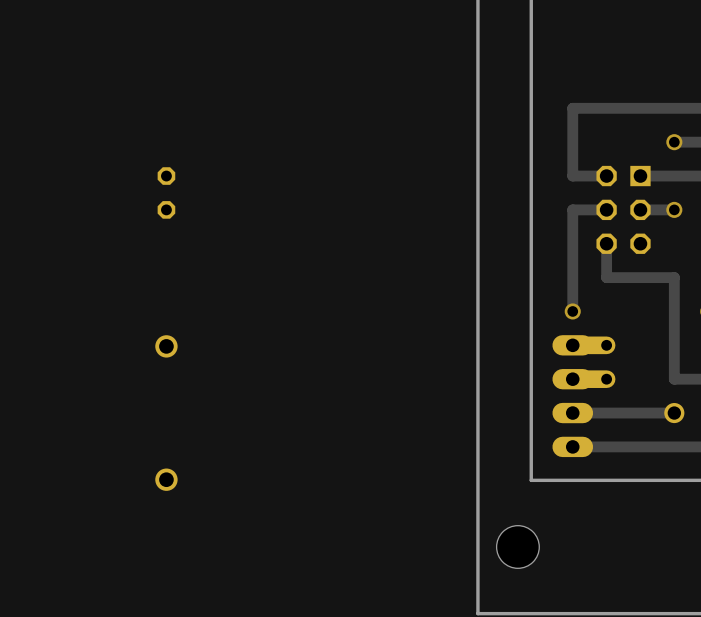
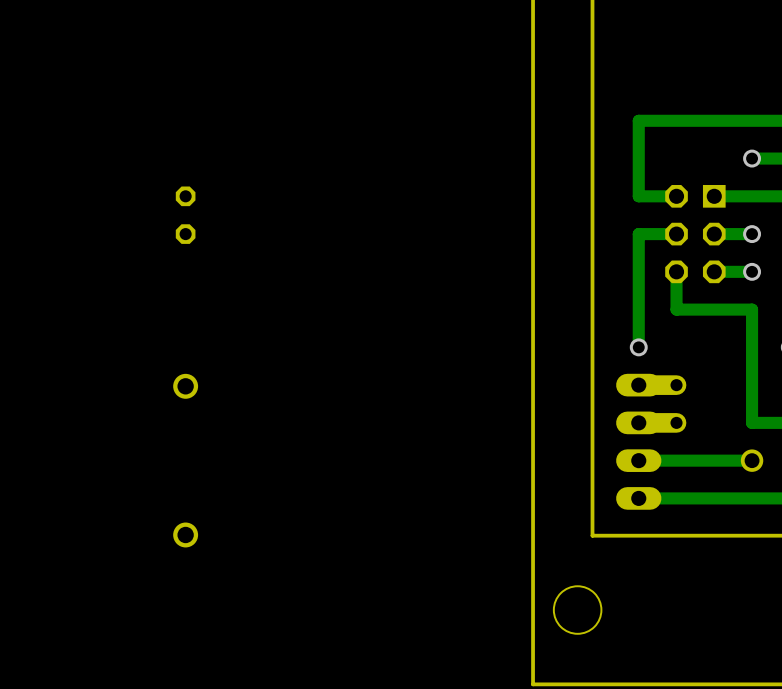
track: none -> (752, 271) (714, 271)
via: none -> (752, 271)

